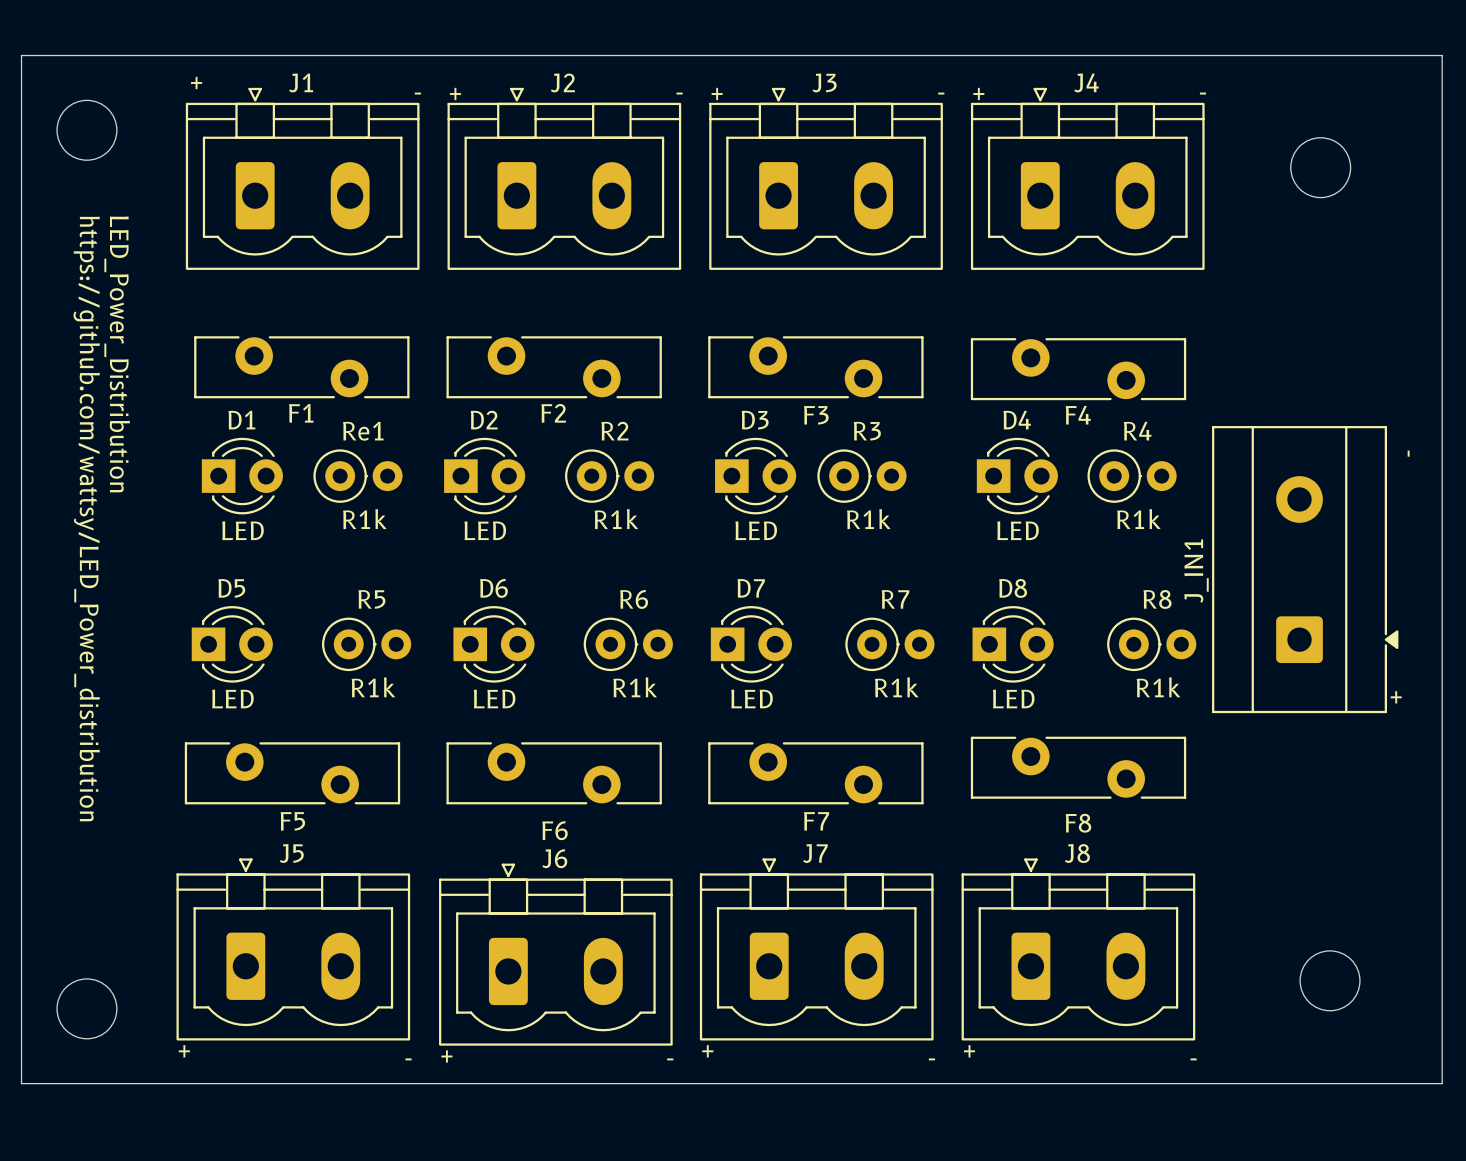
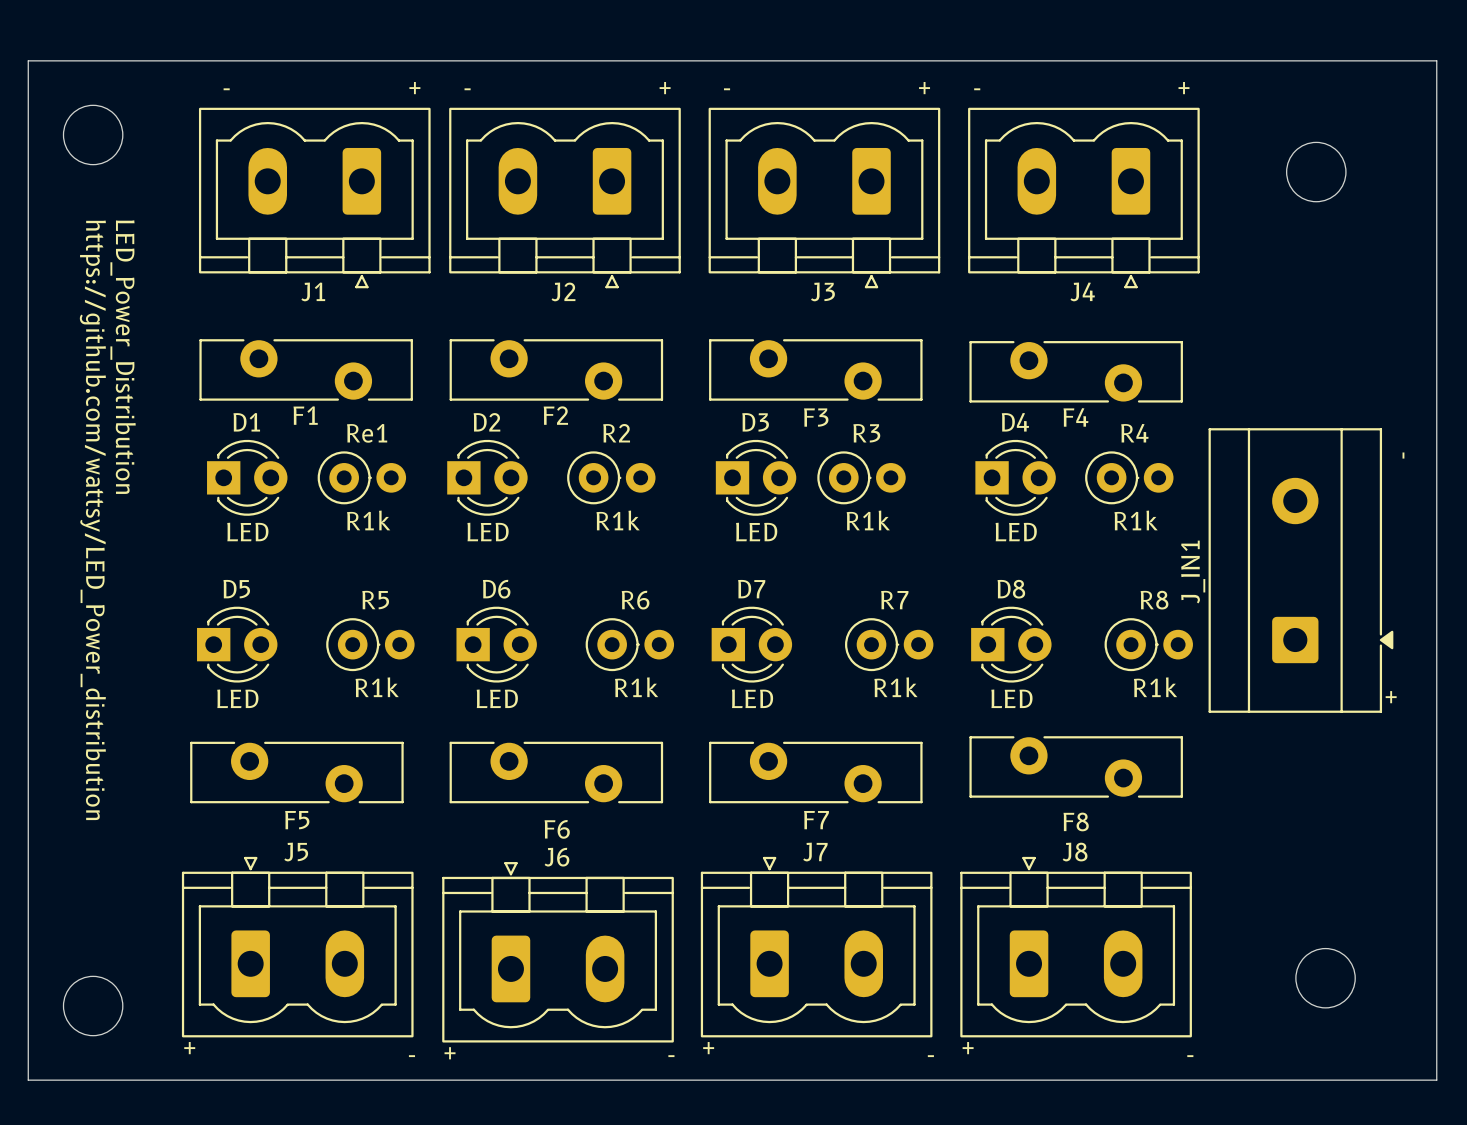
text: + (196, 82) -> none
text: none -> + (1184, 88)
text: none -> - (226, 89)
text position: - (417, 93) -> - (467, 89)
text position: - (679, 93) -> - (727, 89)
text position: - (941, 93) -> - (977, 89)
text: - (1202, 93) -> none
text position: + (455, 94) -> + (414, 88)
text position: + (717, 94) -> + (665, 88)
text position: + (978, 94) -> + (924, 88)
J1 rotation: 0° (302, 178) -> 180° (314, 198)
J2 rotation: 0° (564, 178) -> 180° (564, 198)
J3 rotation: 0° (826, 178) -> 180° (824, 198)
J4 rotation: 0° (1087, 178) -> 180° (1083, 198)

